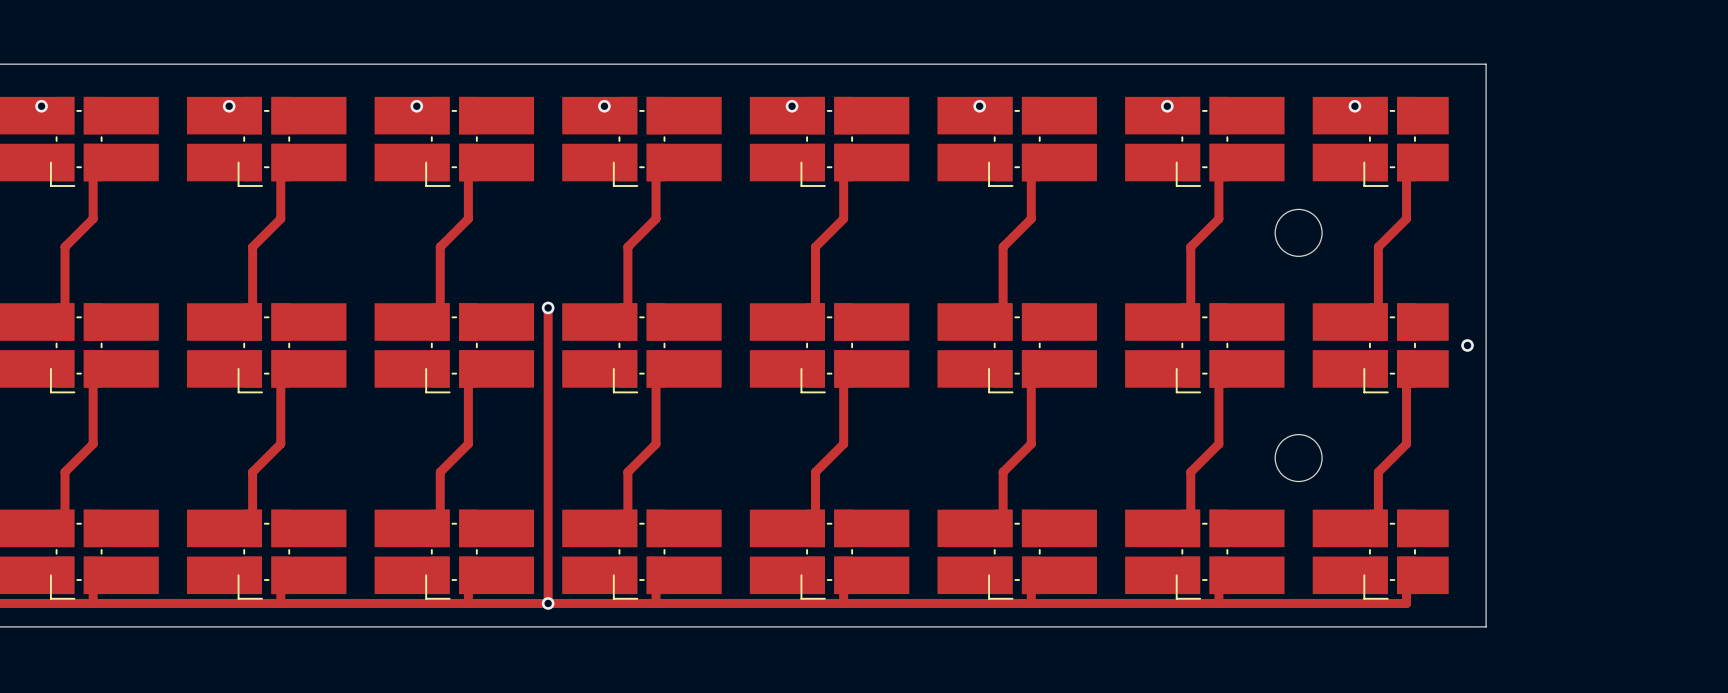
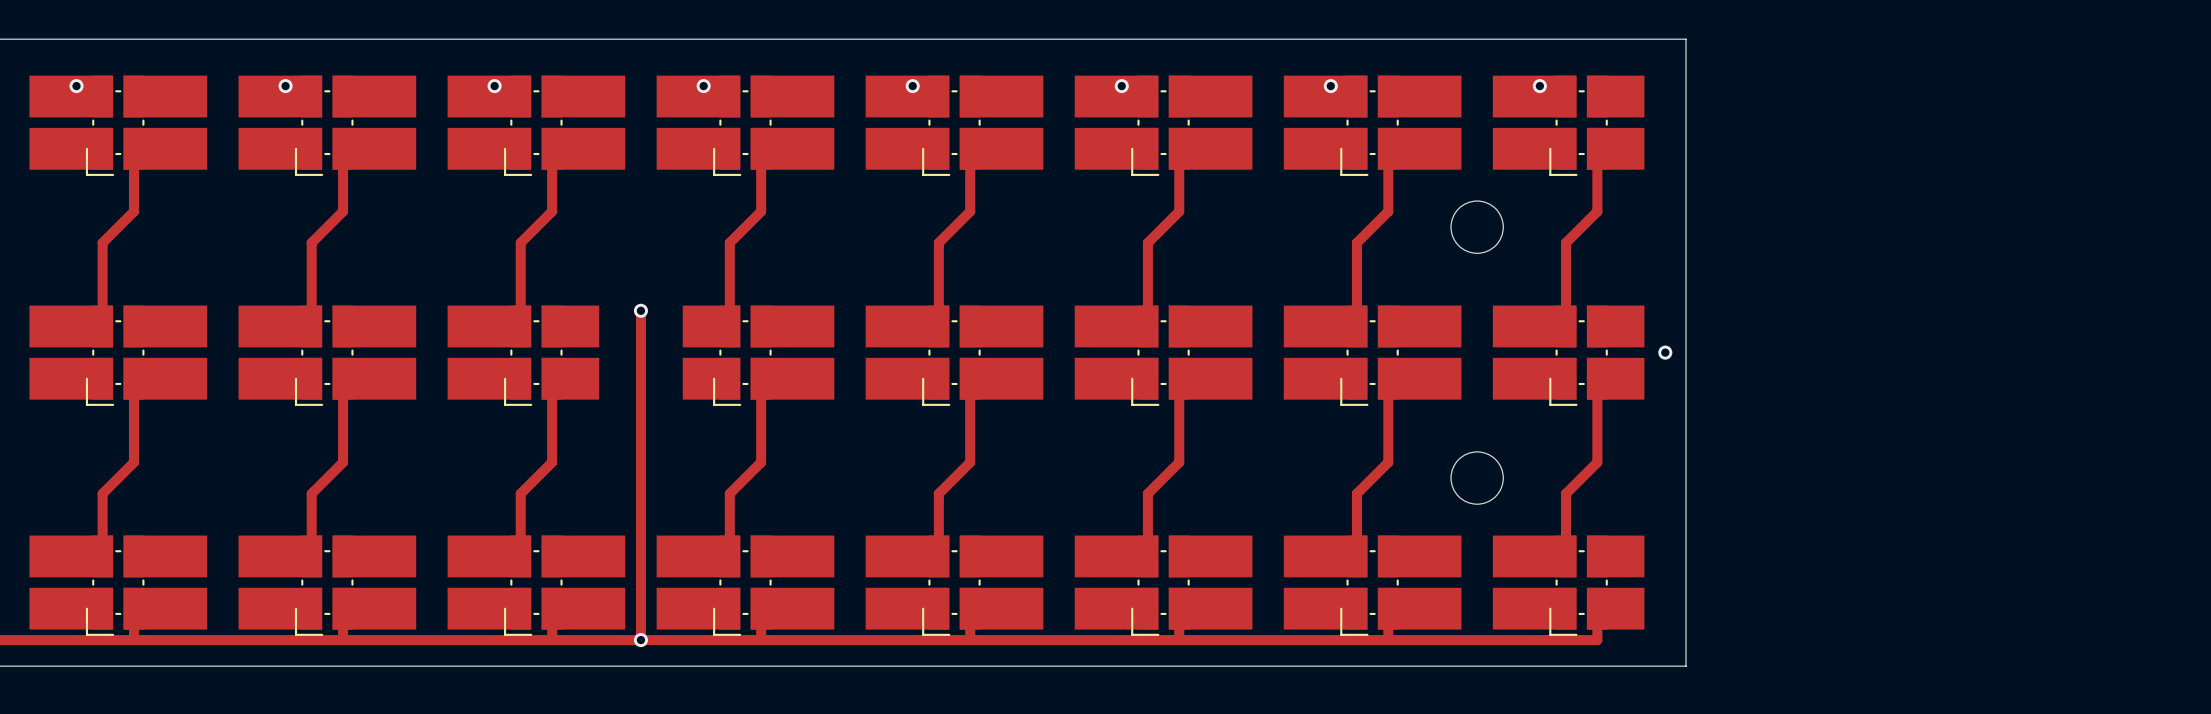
drawing shape: [459, 303, 535, 341] -> [541, 305, 600, 348]
drawing shape: [562, 303, 638, 341] -> [682, 305, 741, 348]
drawing shape: [459, 350, 535, 388] -> [541, 357, 600, 400]
drawing shape: [562, 350, 638, 388] -> [682, 357, 741, 400]

